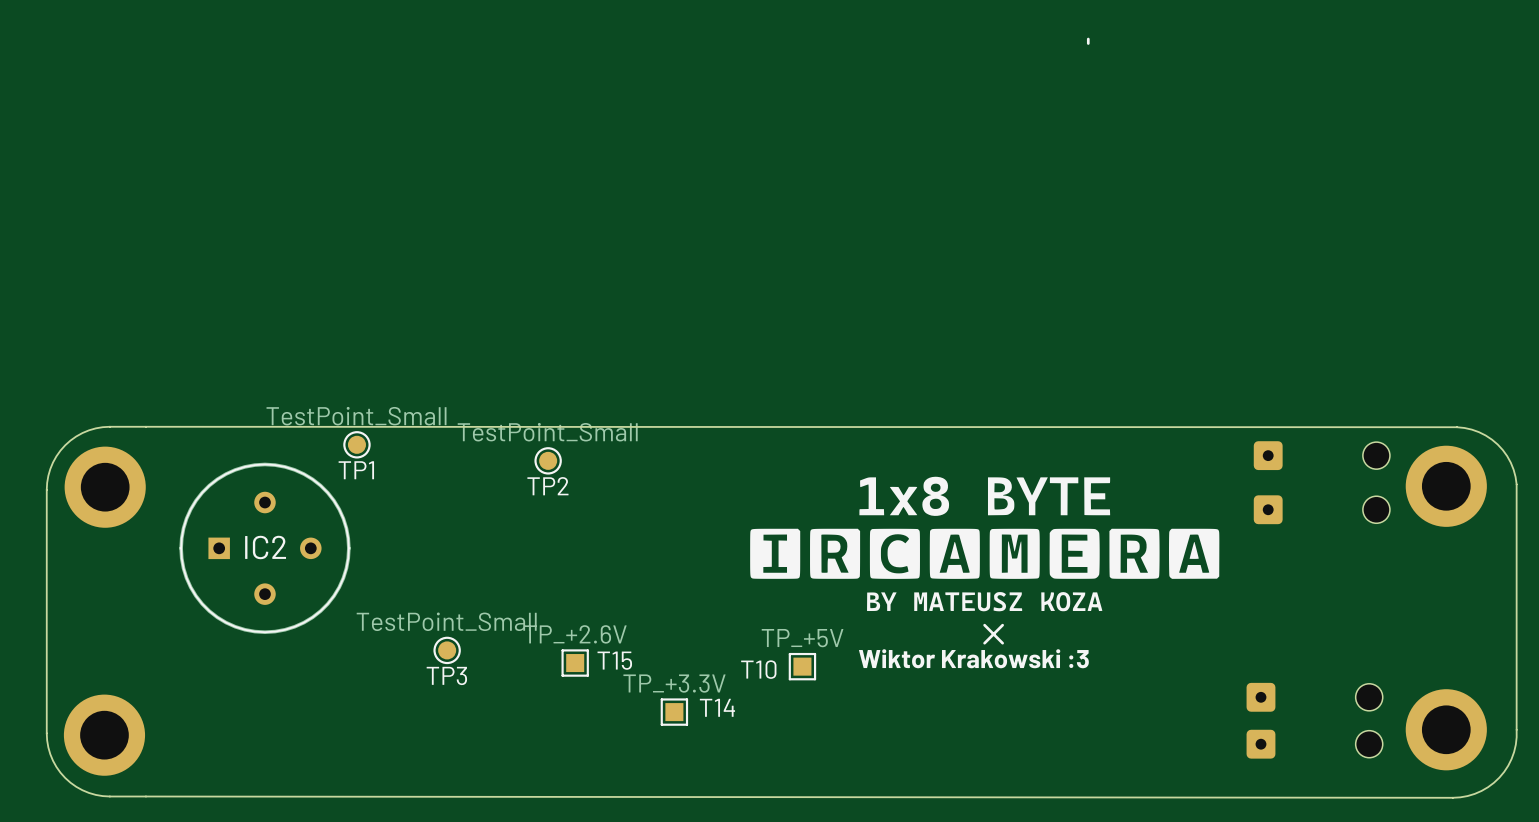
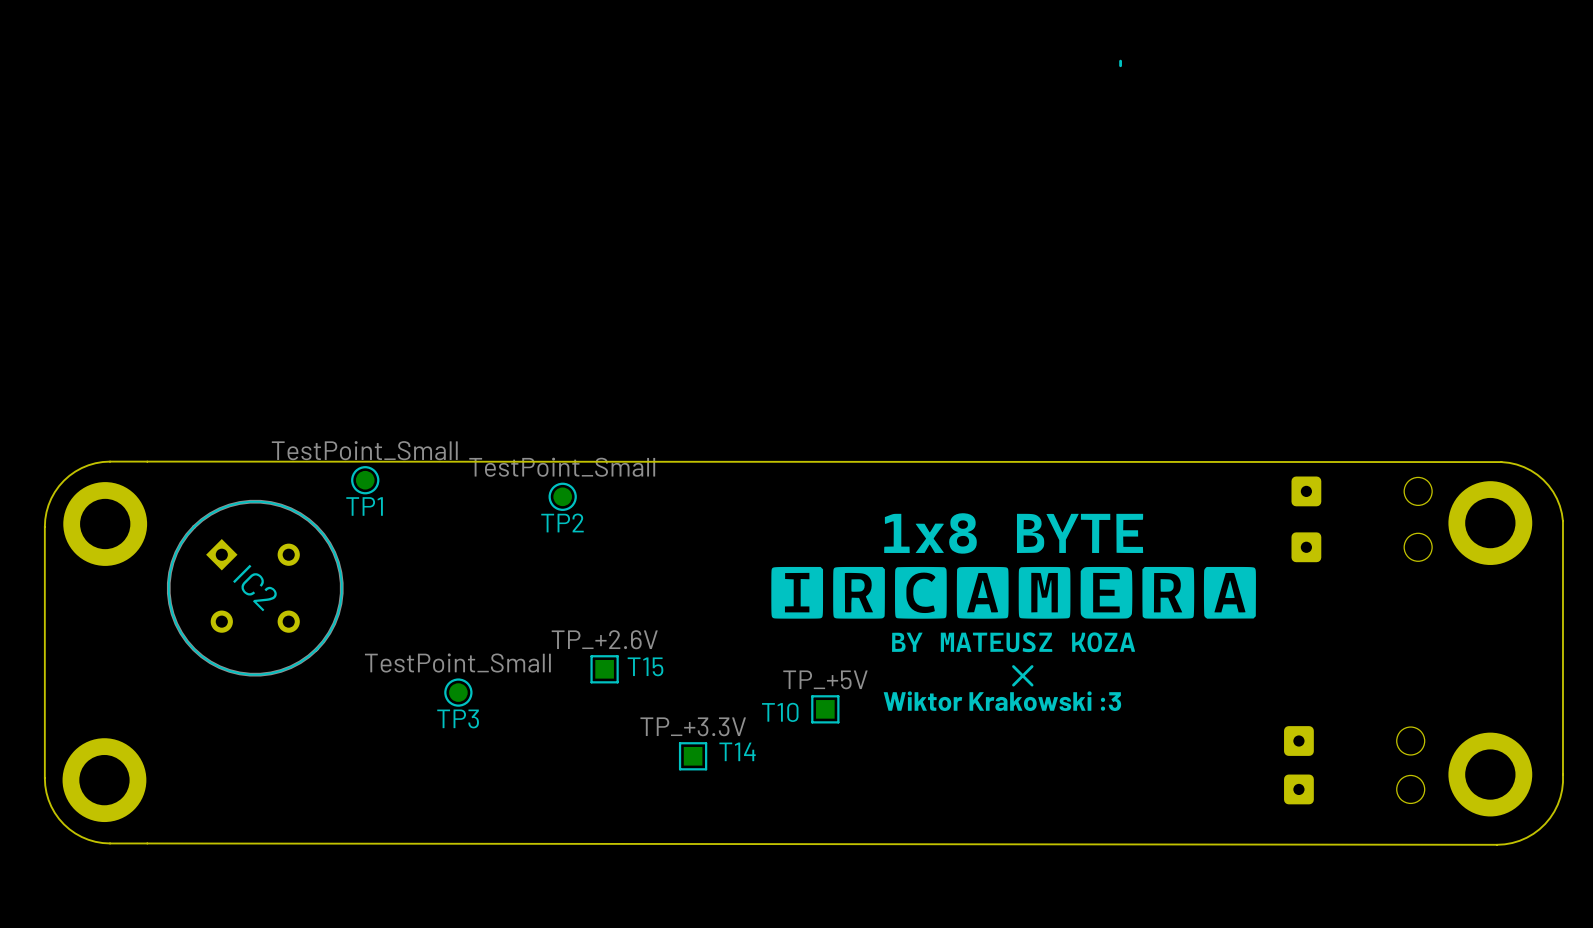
IC2 rotation: 0° (264, 548) -> 45° clockwise (255, 588)
T15 position: (575, 663) -> (604, 669)

